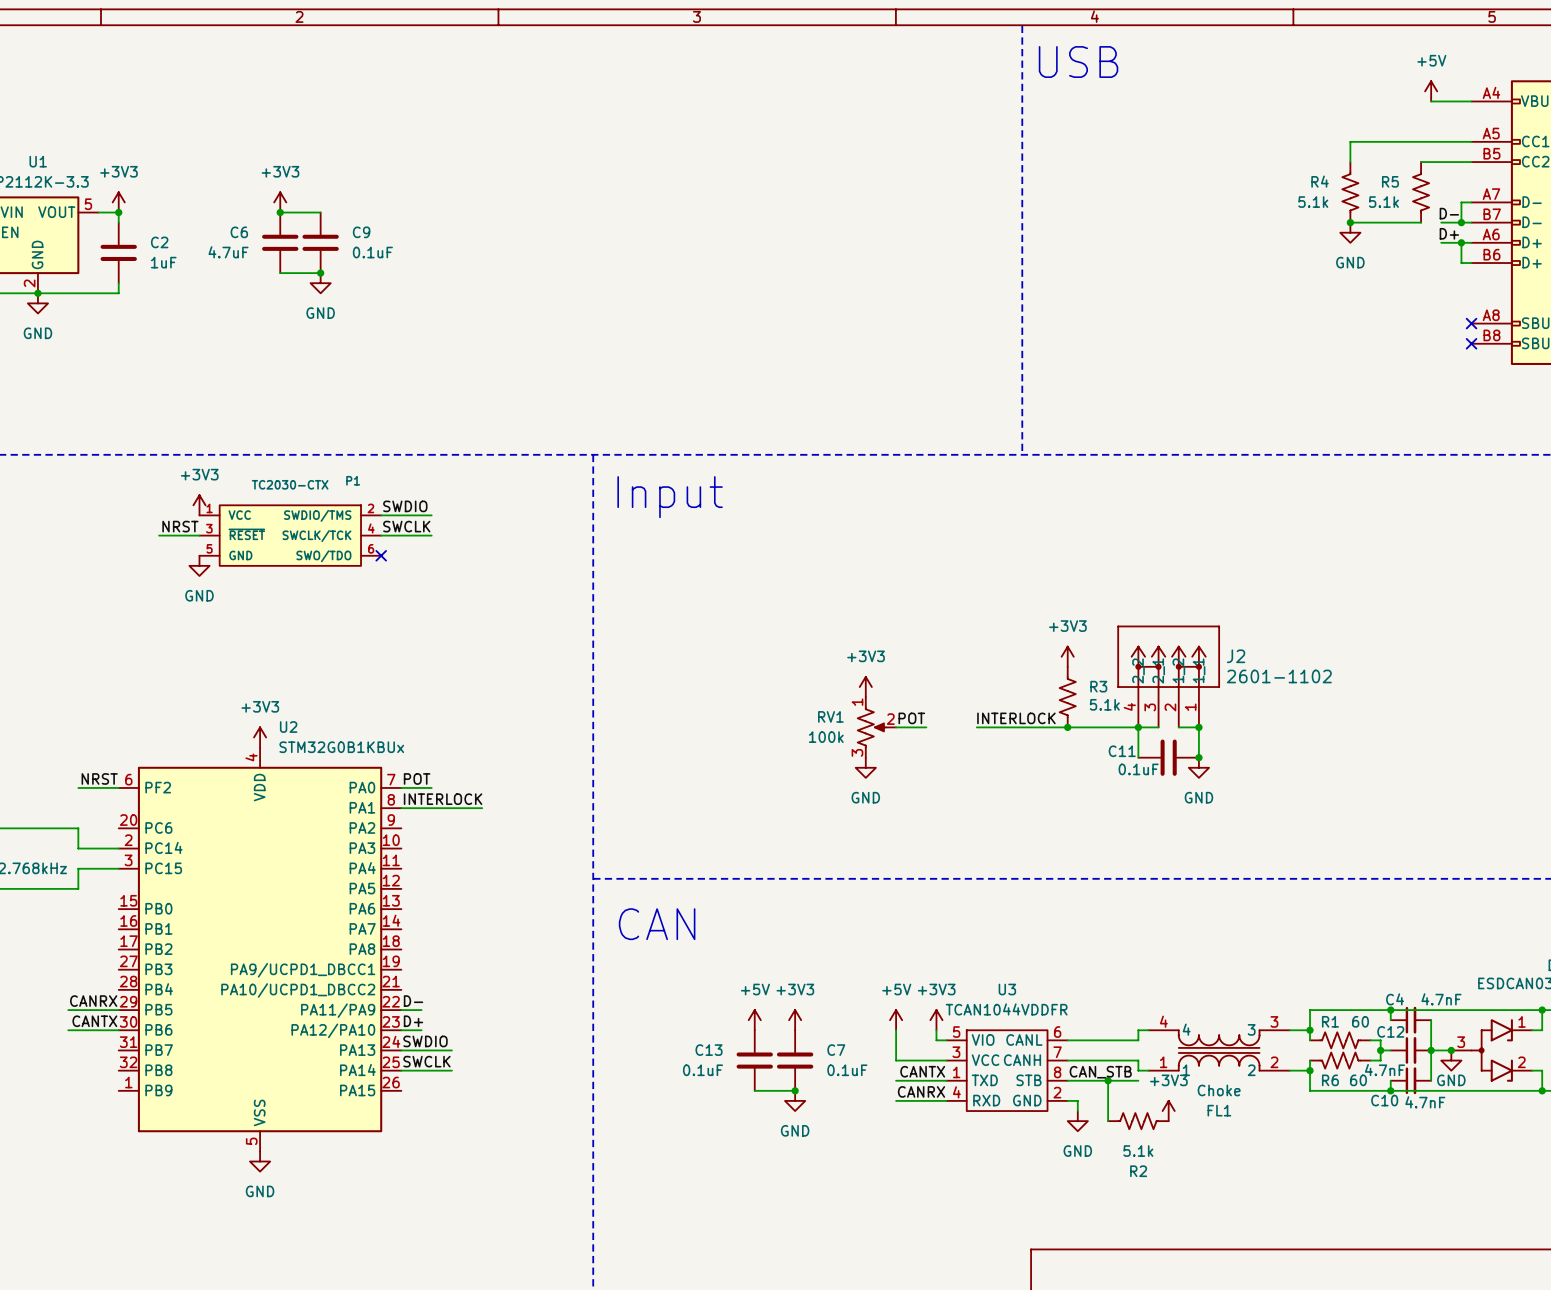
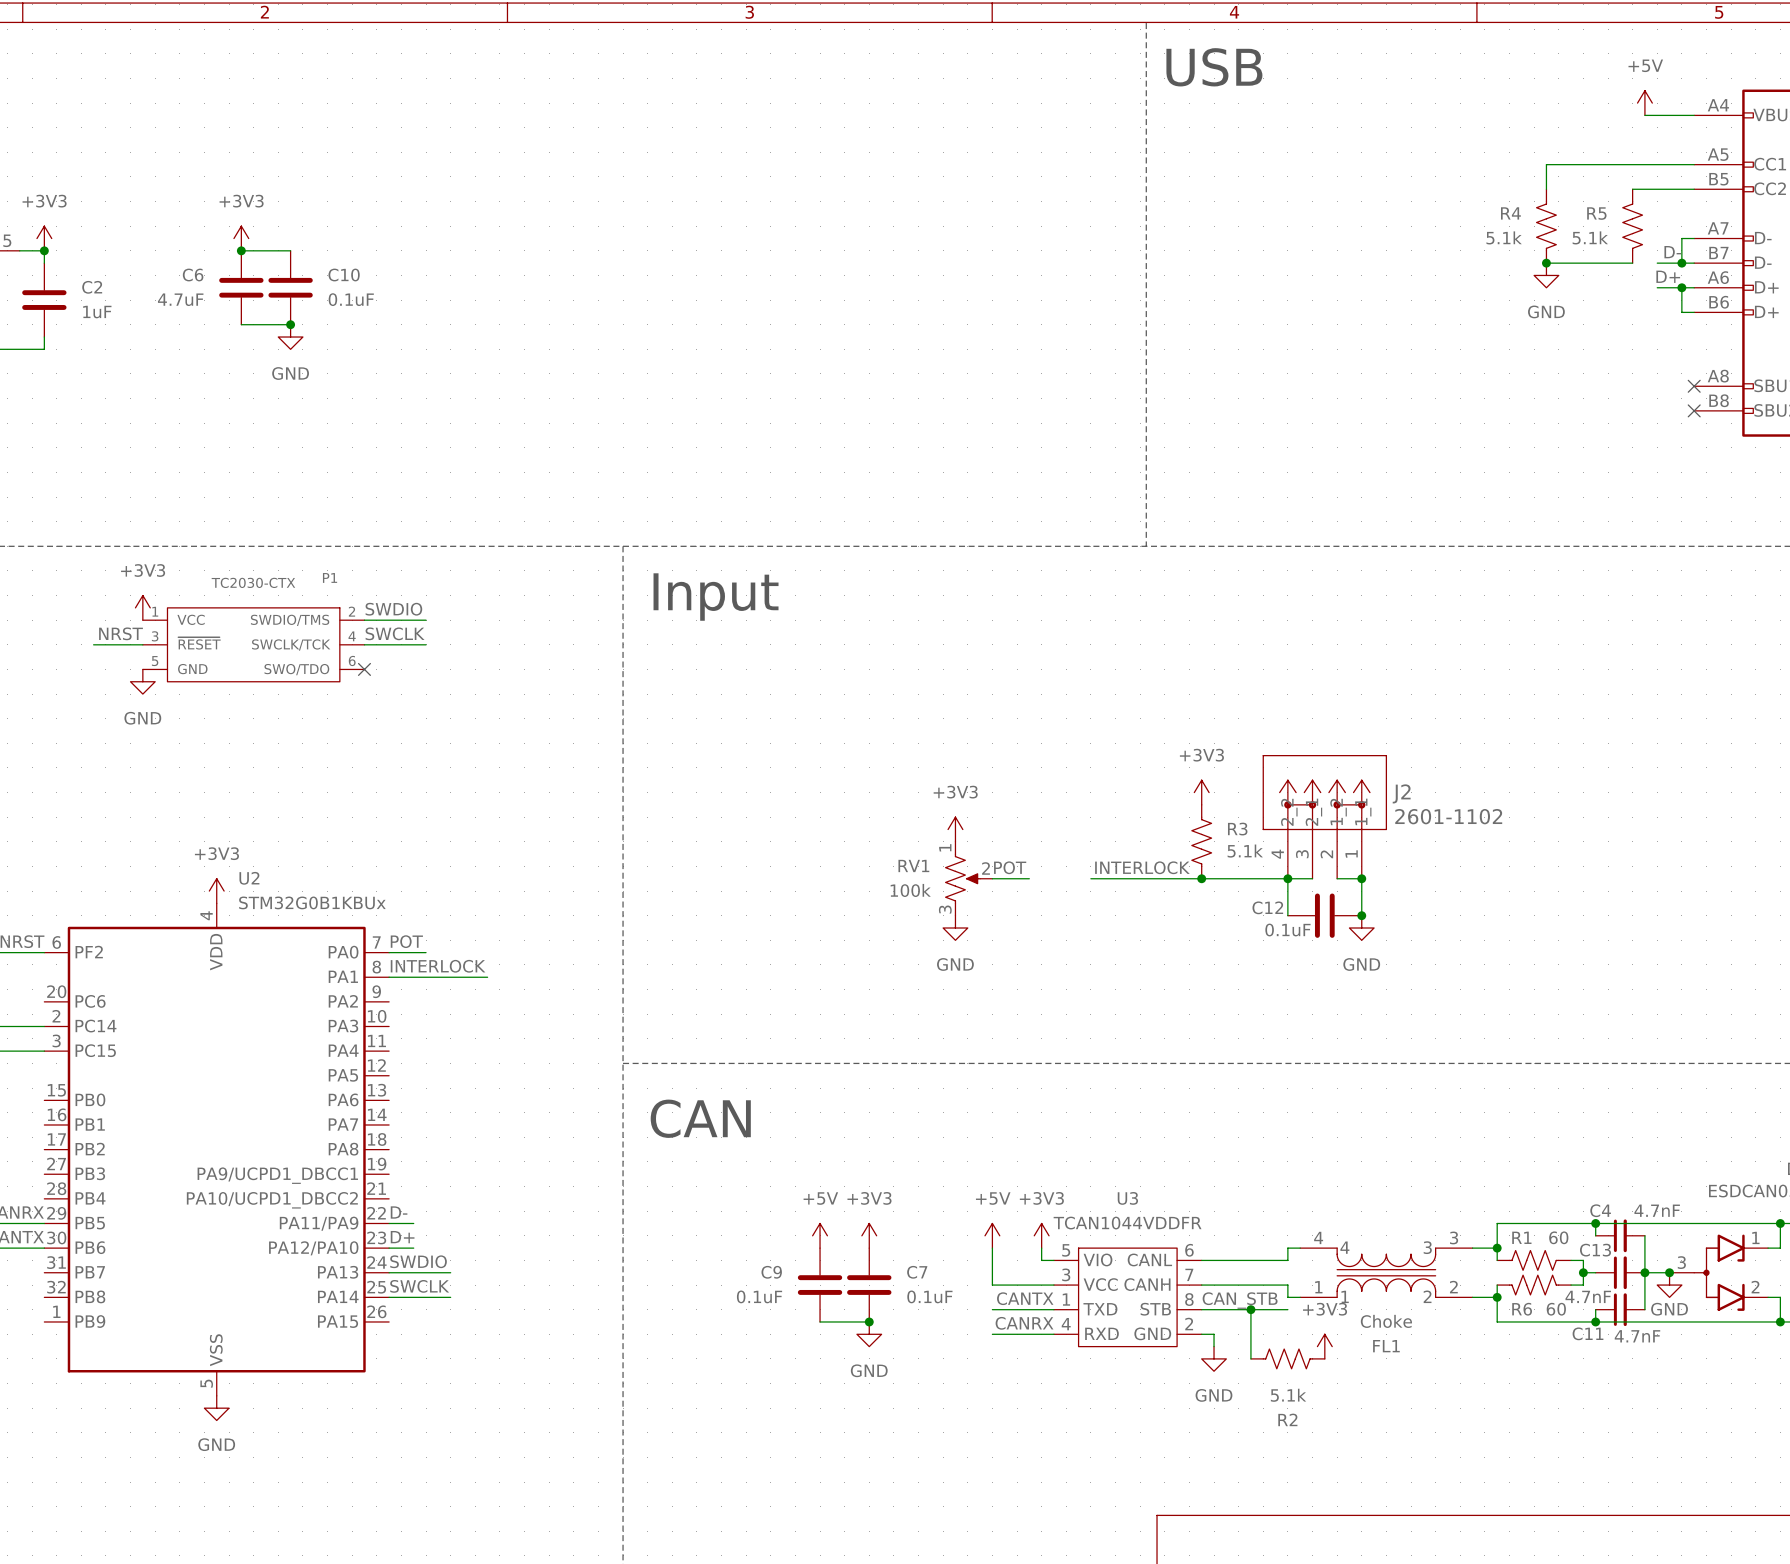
C9 name: C9 (361, 232) -> C10 (344, 275)
C11 name: C11 (1122, 751) -> C12 (1267, 907)
C12 name: C12 (1390, 1031) -> C13 (1595, 1250)
C13 name: C13 (709, 1050) -> C9 (771, 1272)
C10 name: C10 (1384, 1100) -> C11 (1587, 1333)

